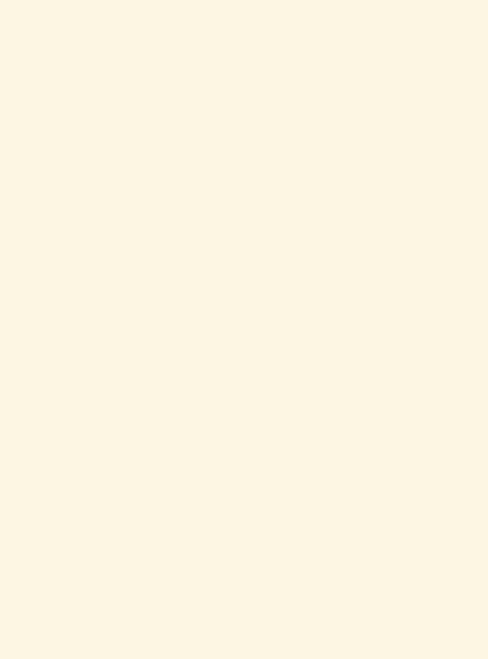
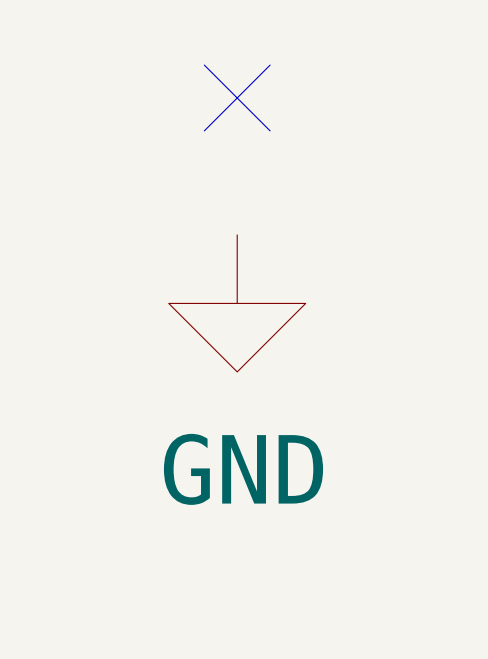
no-connect mark: none -> (237, 97)
power symbol: none -> GND (237, 303)

